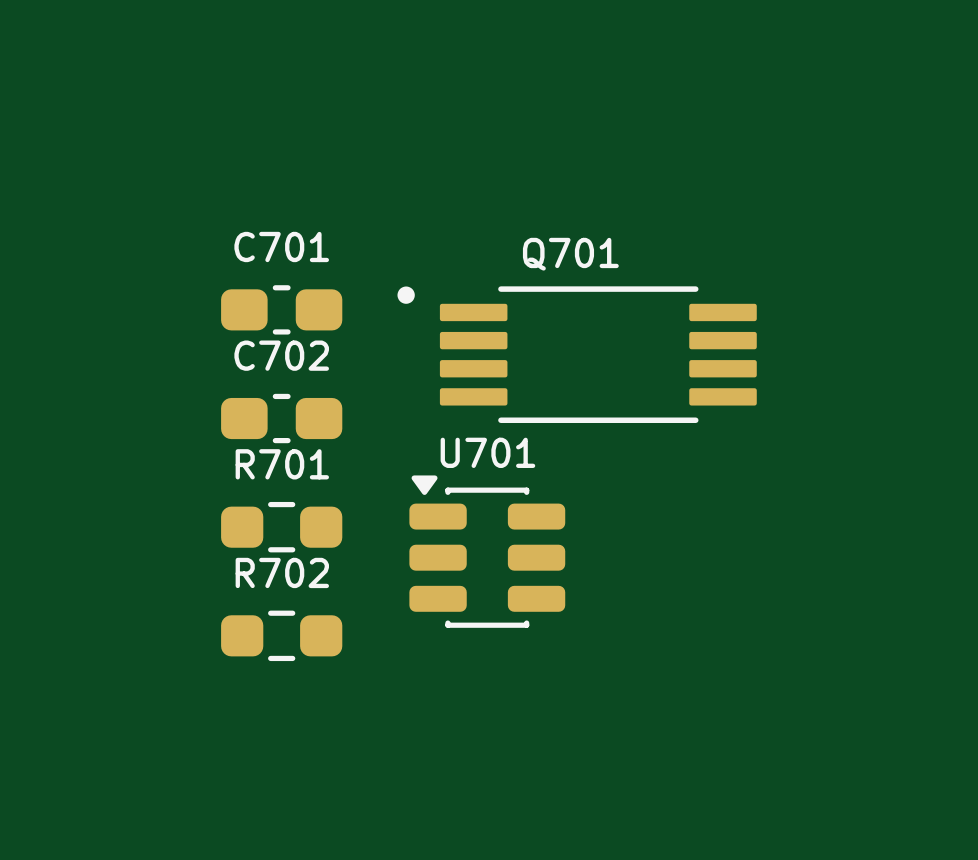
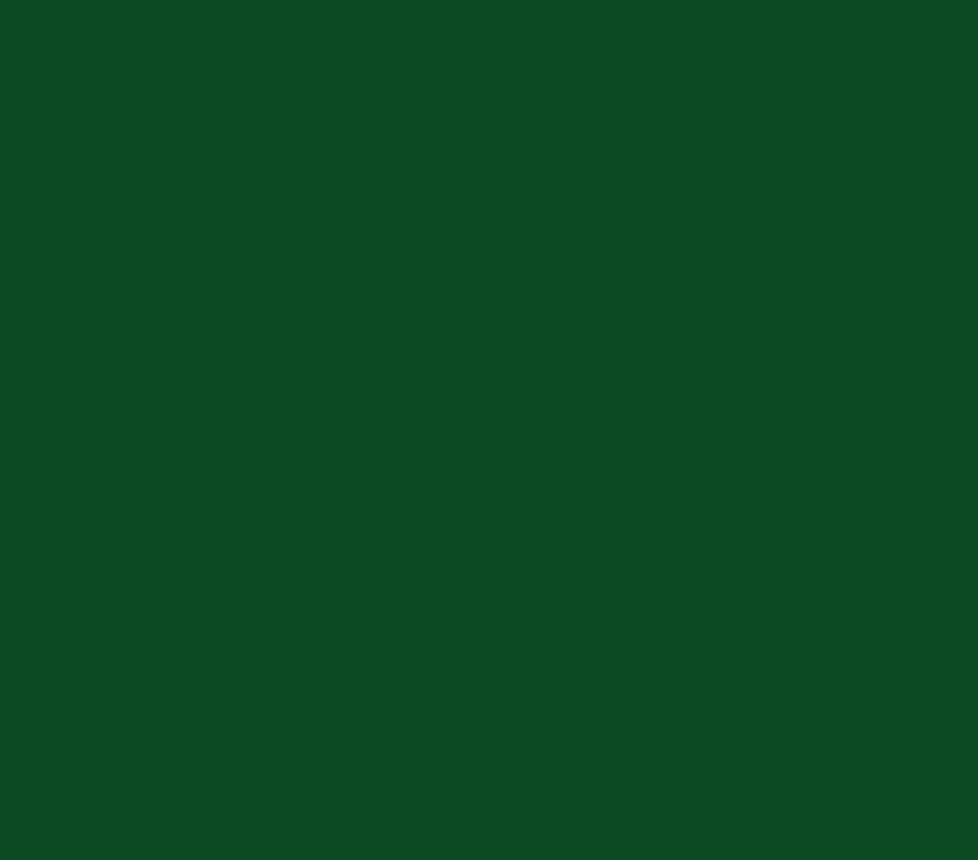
C701: (281, 309) -> none
Q701: (577, 354) -> none
C702: (281, 418) -> none
R701: (281, 527) -> none
U701: (487, 551) -> none
R702: (281, 635) -> none

